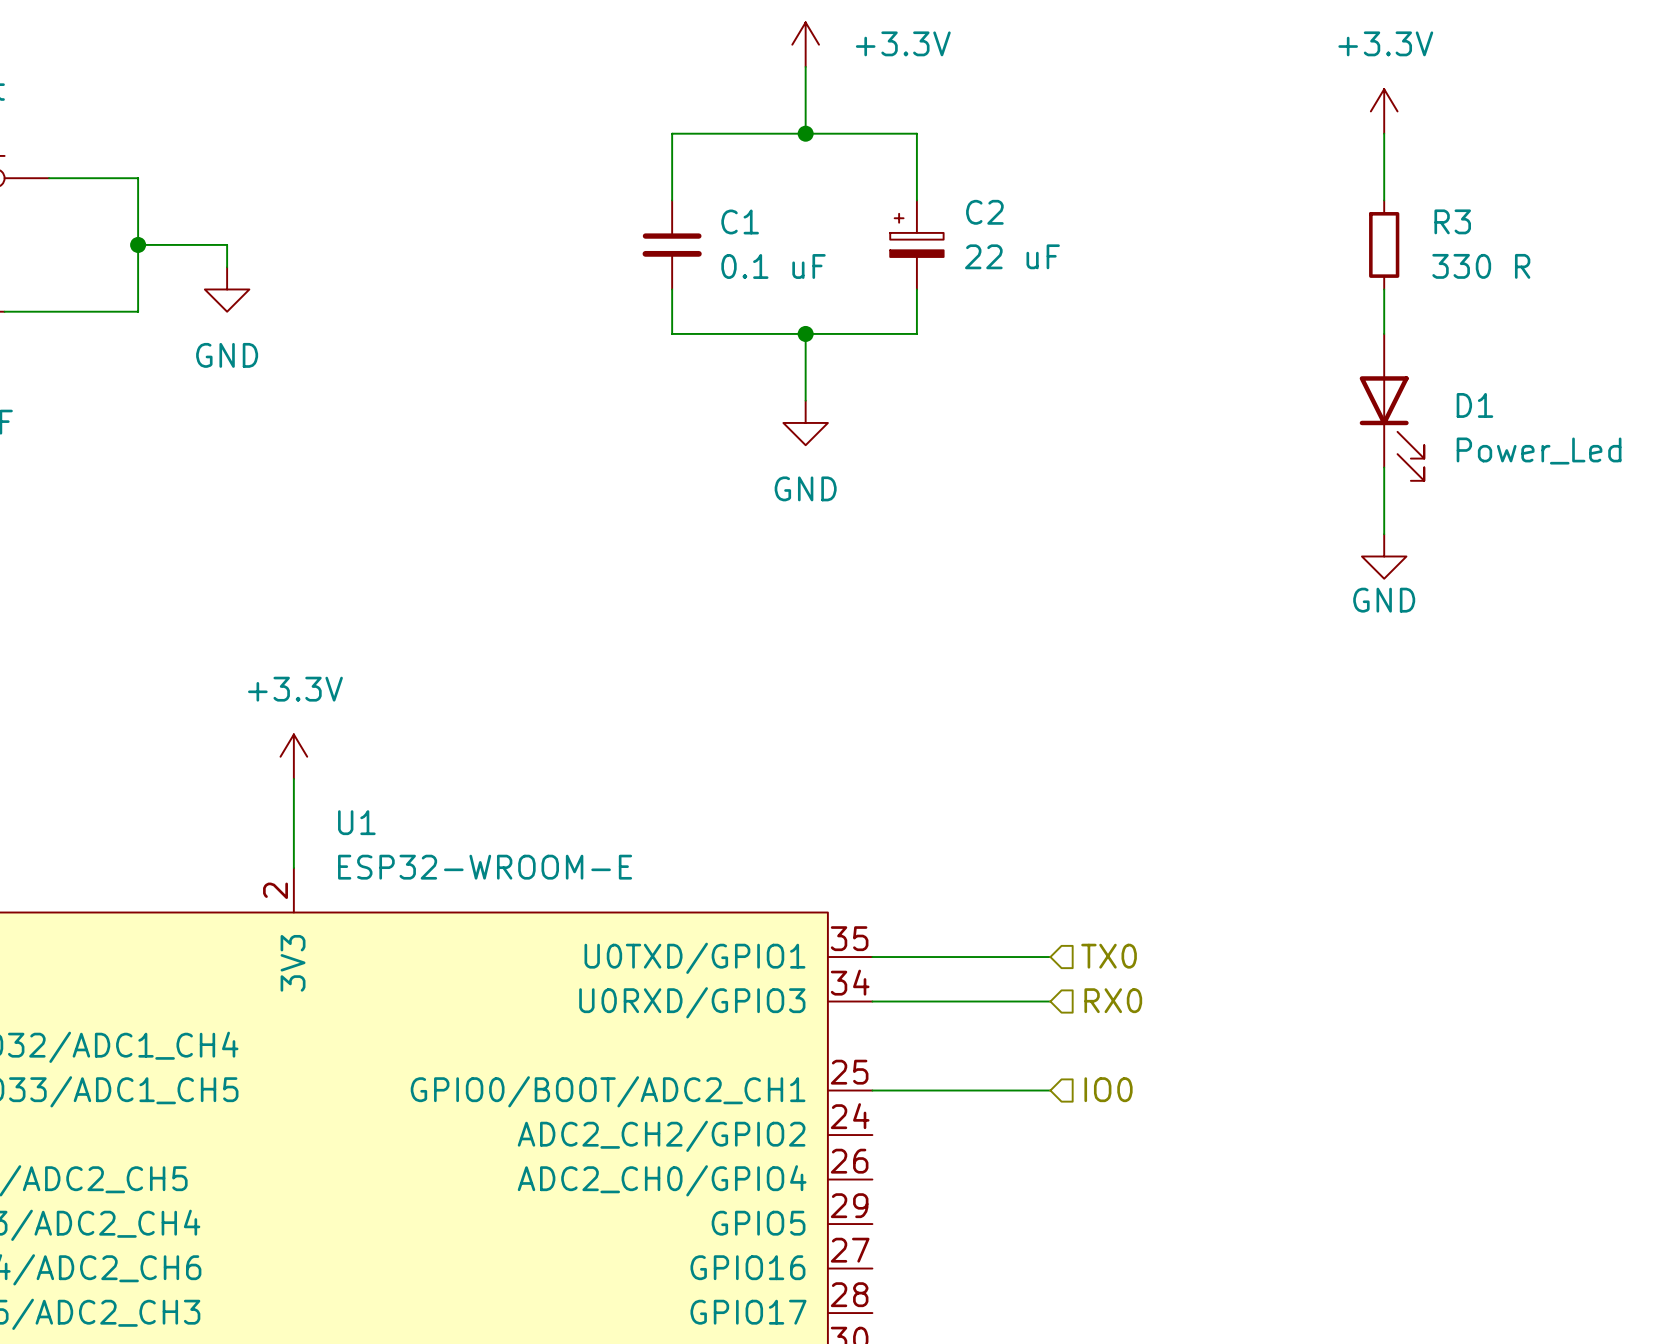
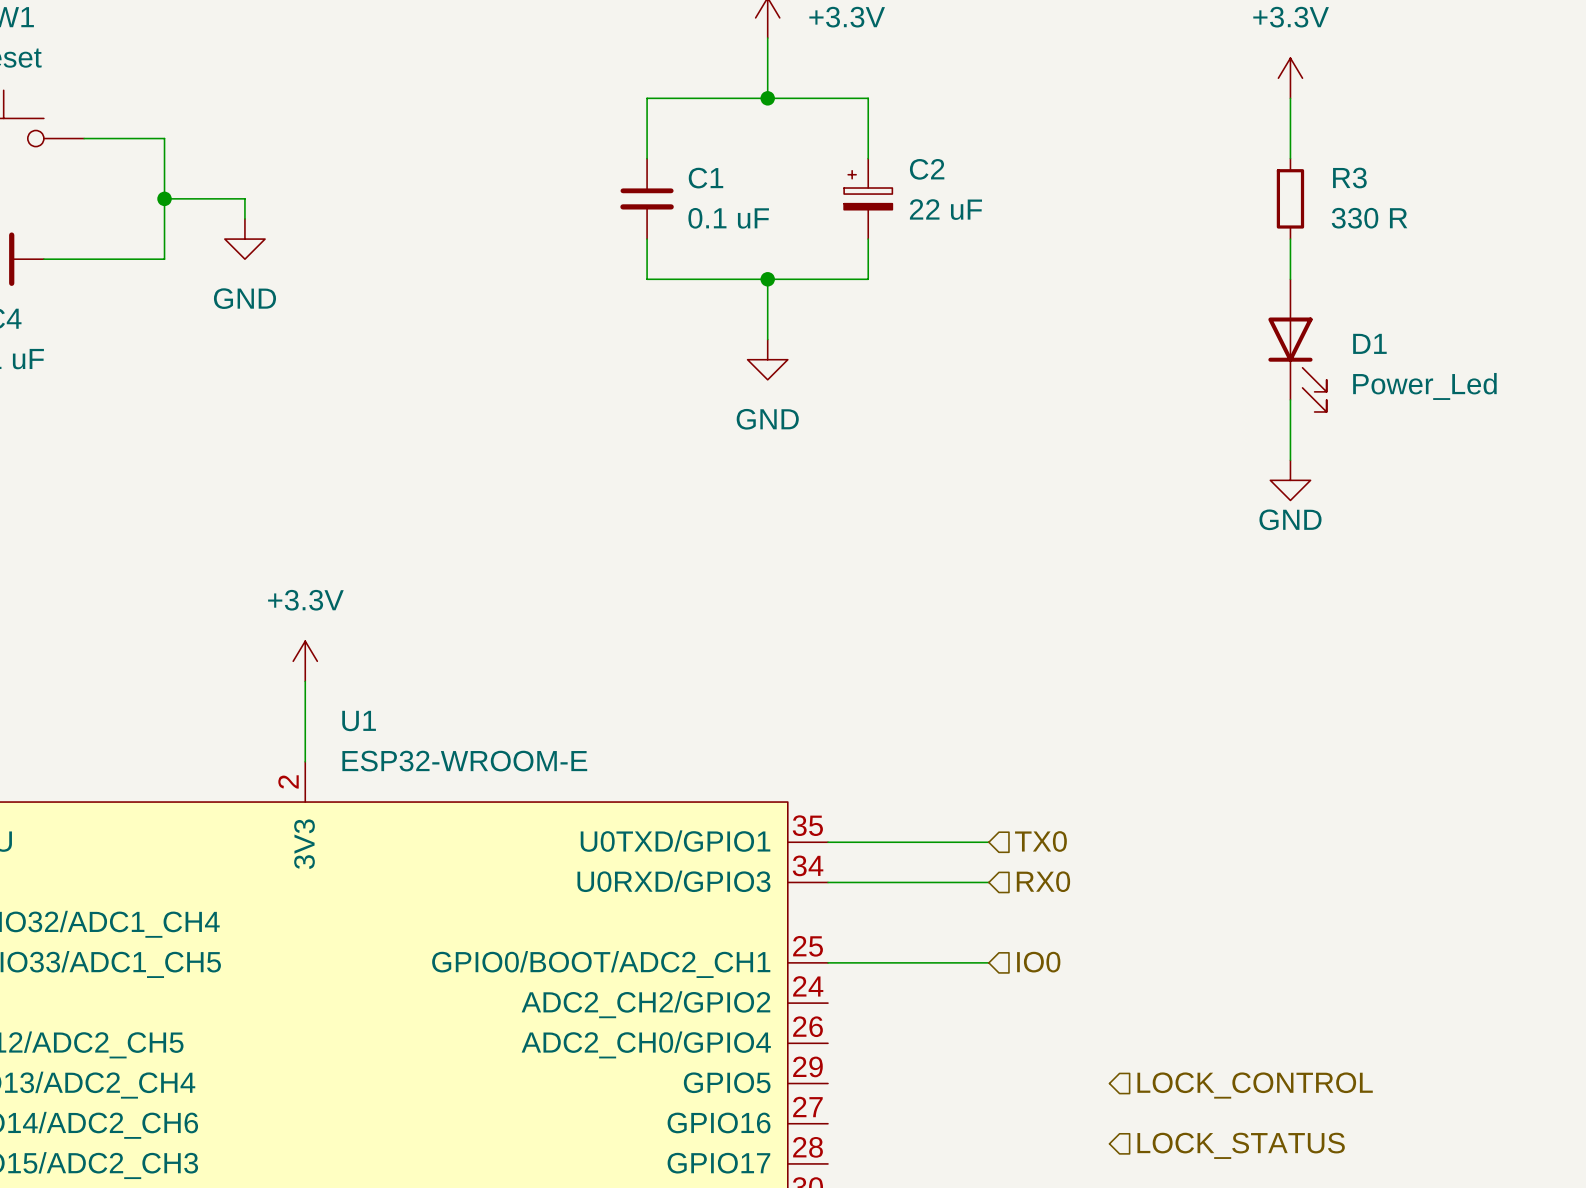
hierarchical label: none -> LOCK_CONTROL (1255, 1085)
hierarchical label: none -> LOCK_STATUS (1241, 1145)

